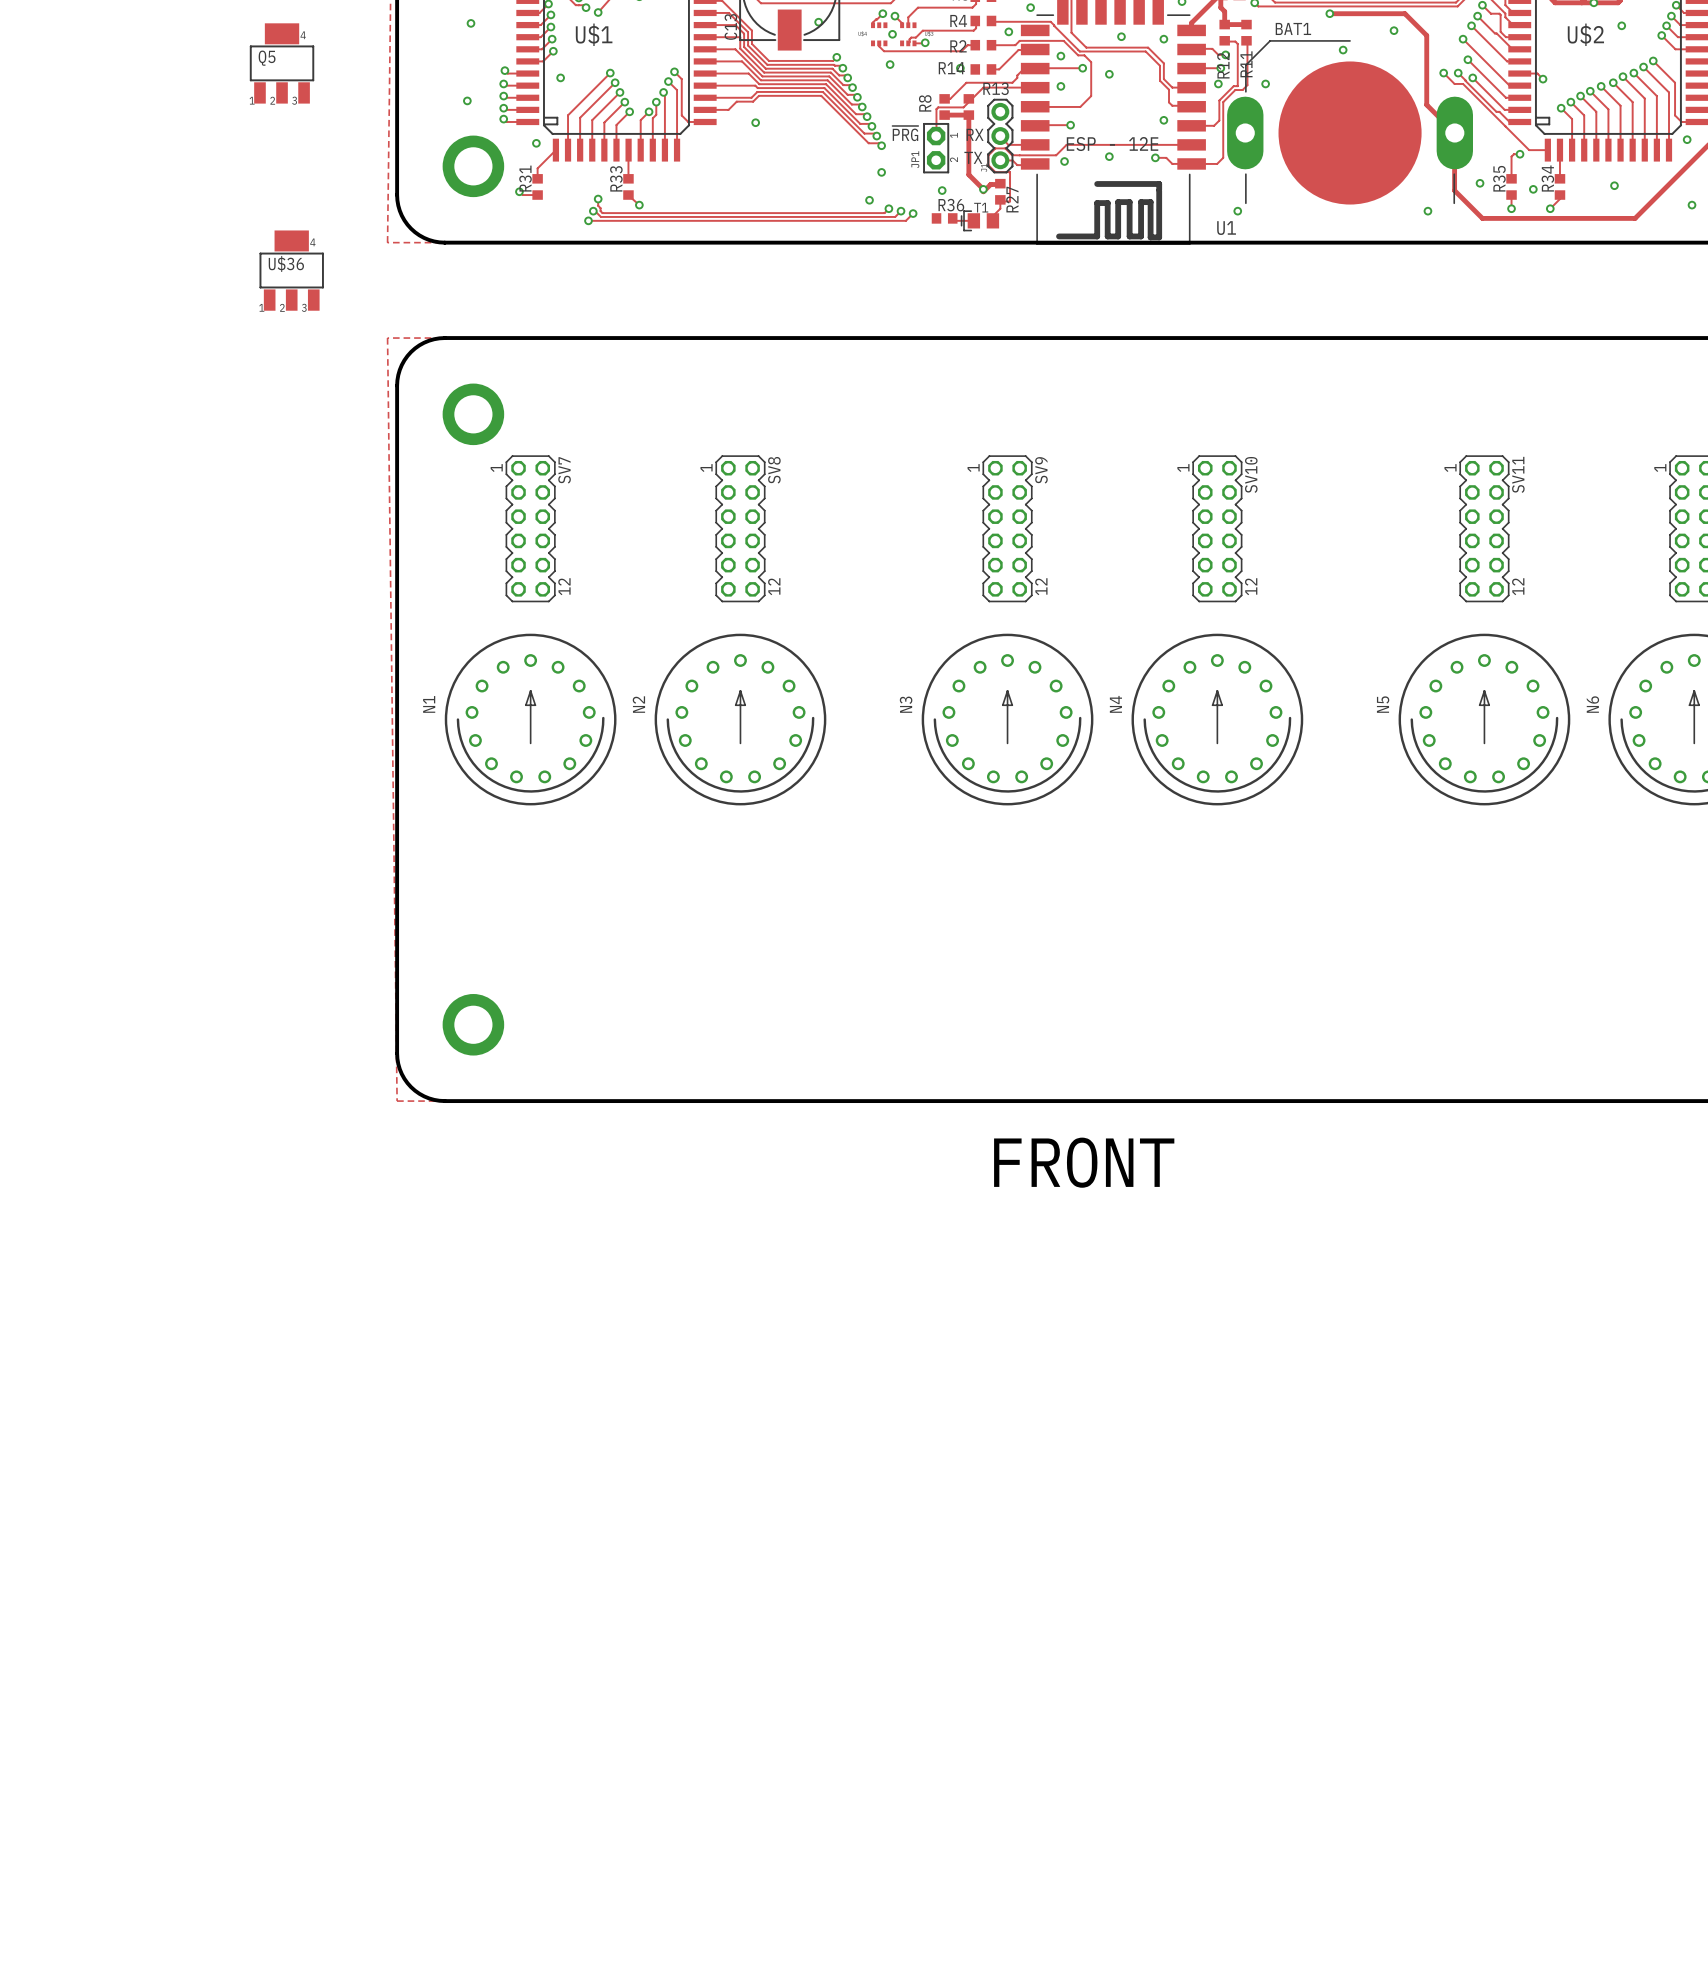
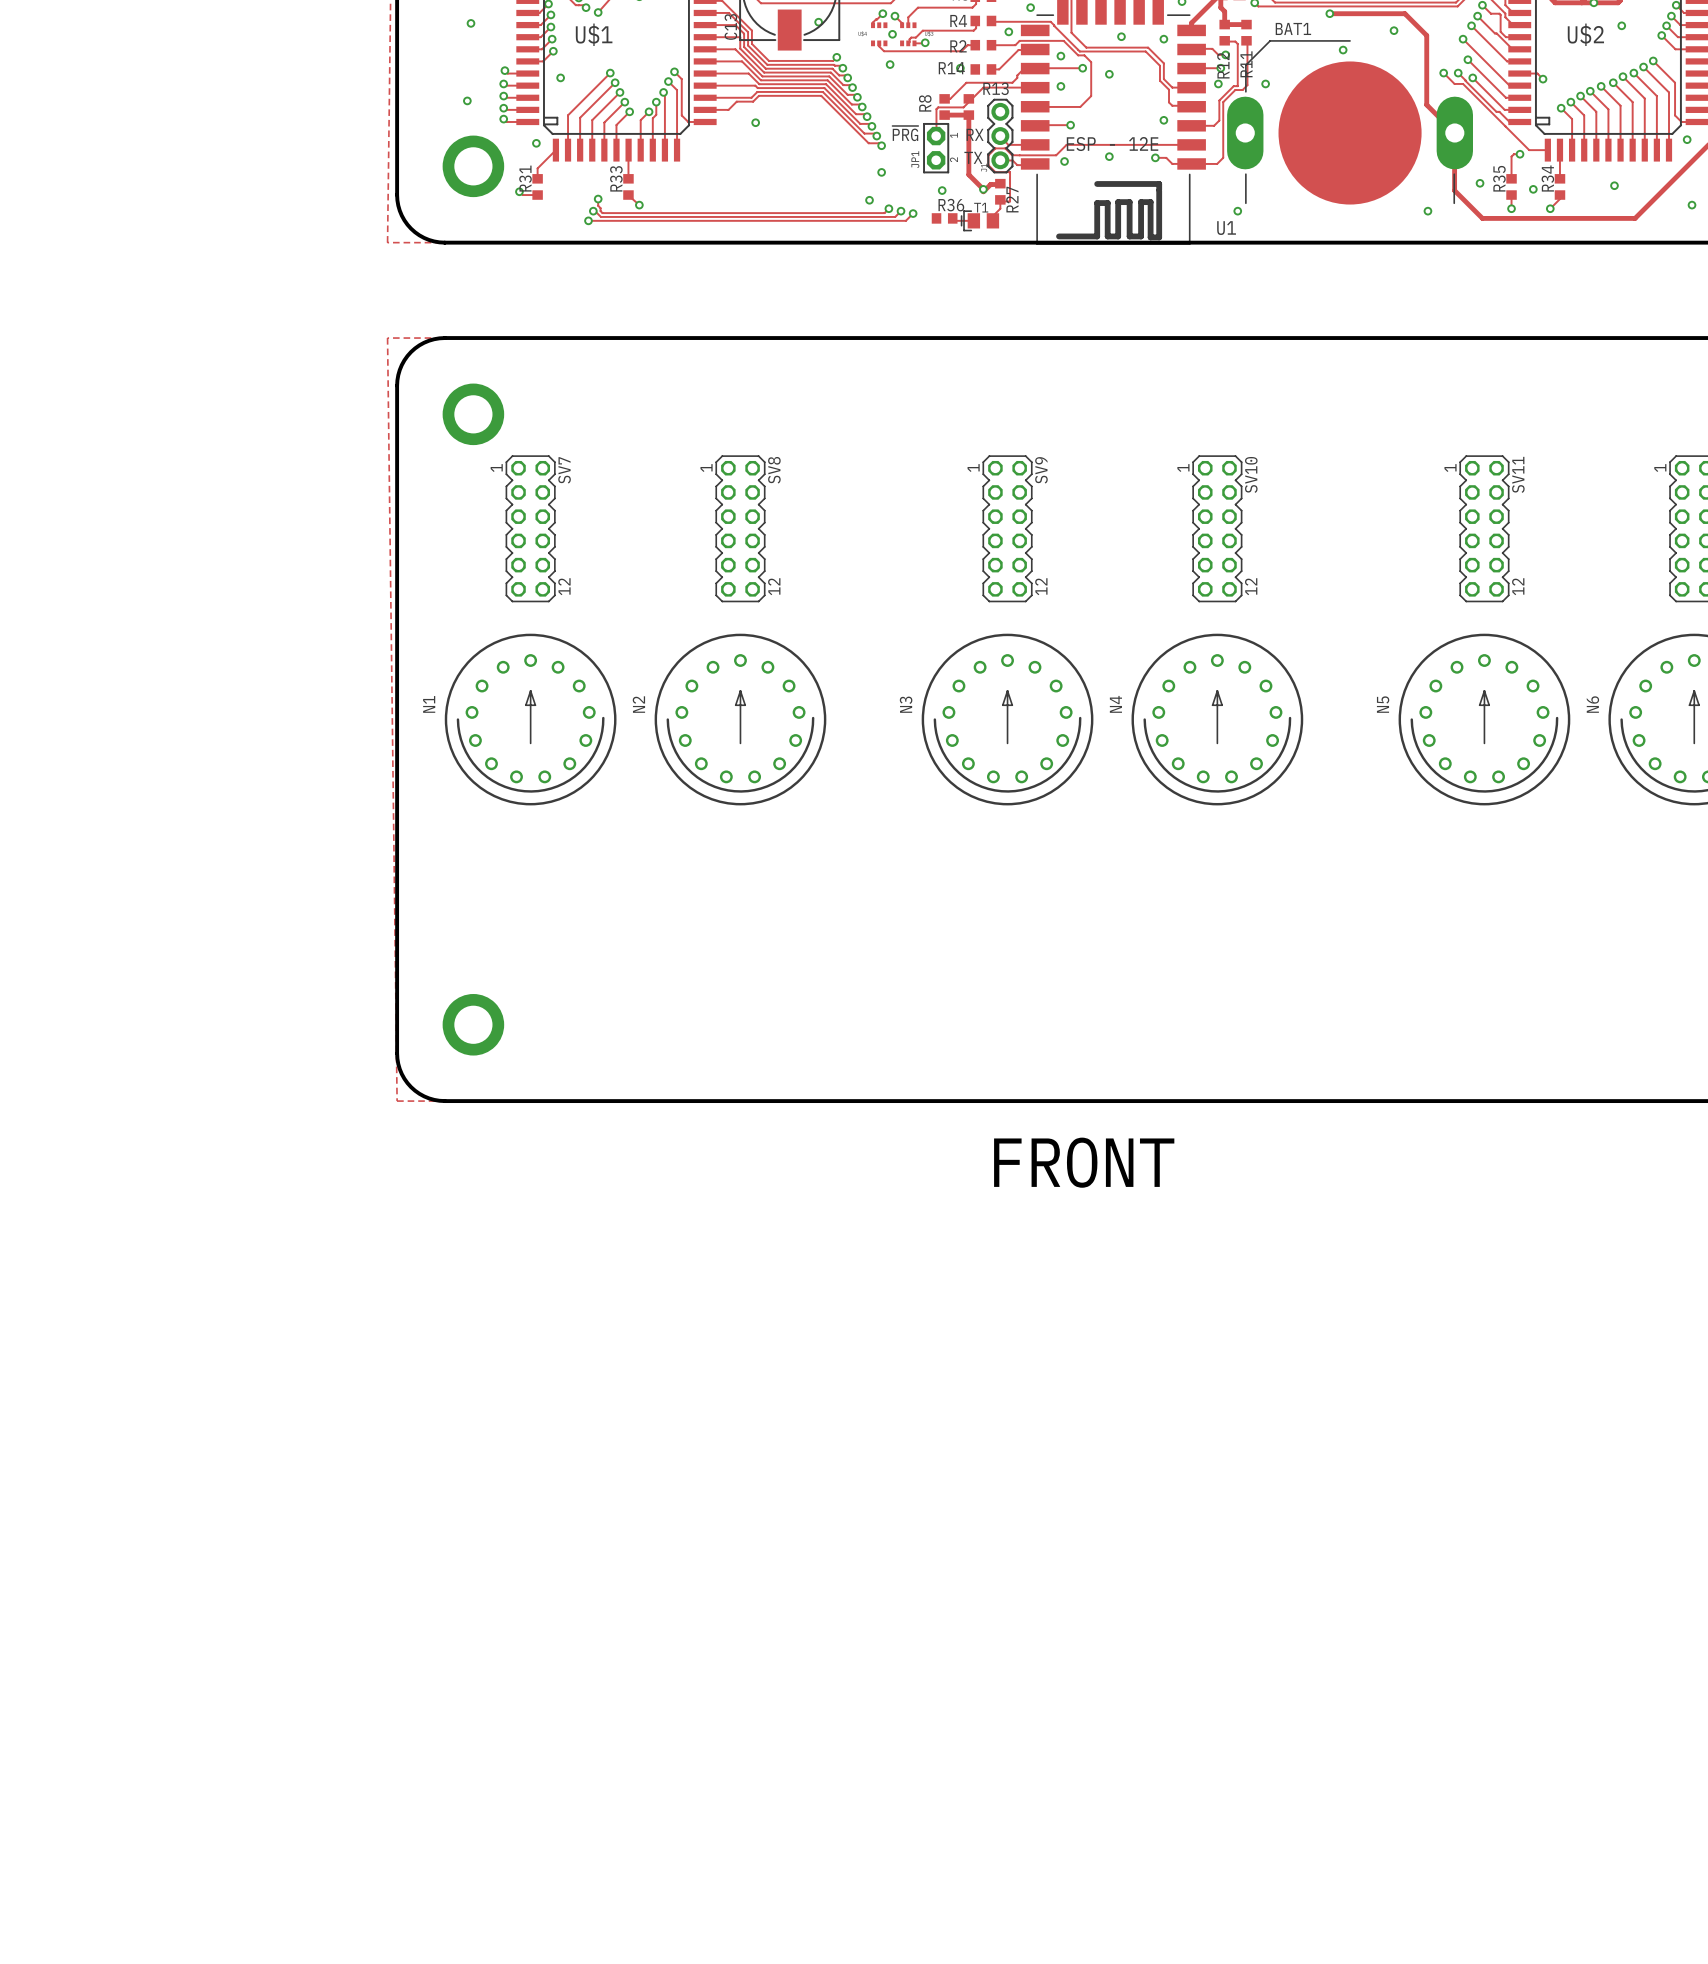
Q5: (282, 63) -> none
U$36: (291, 270) -> none

